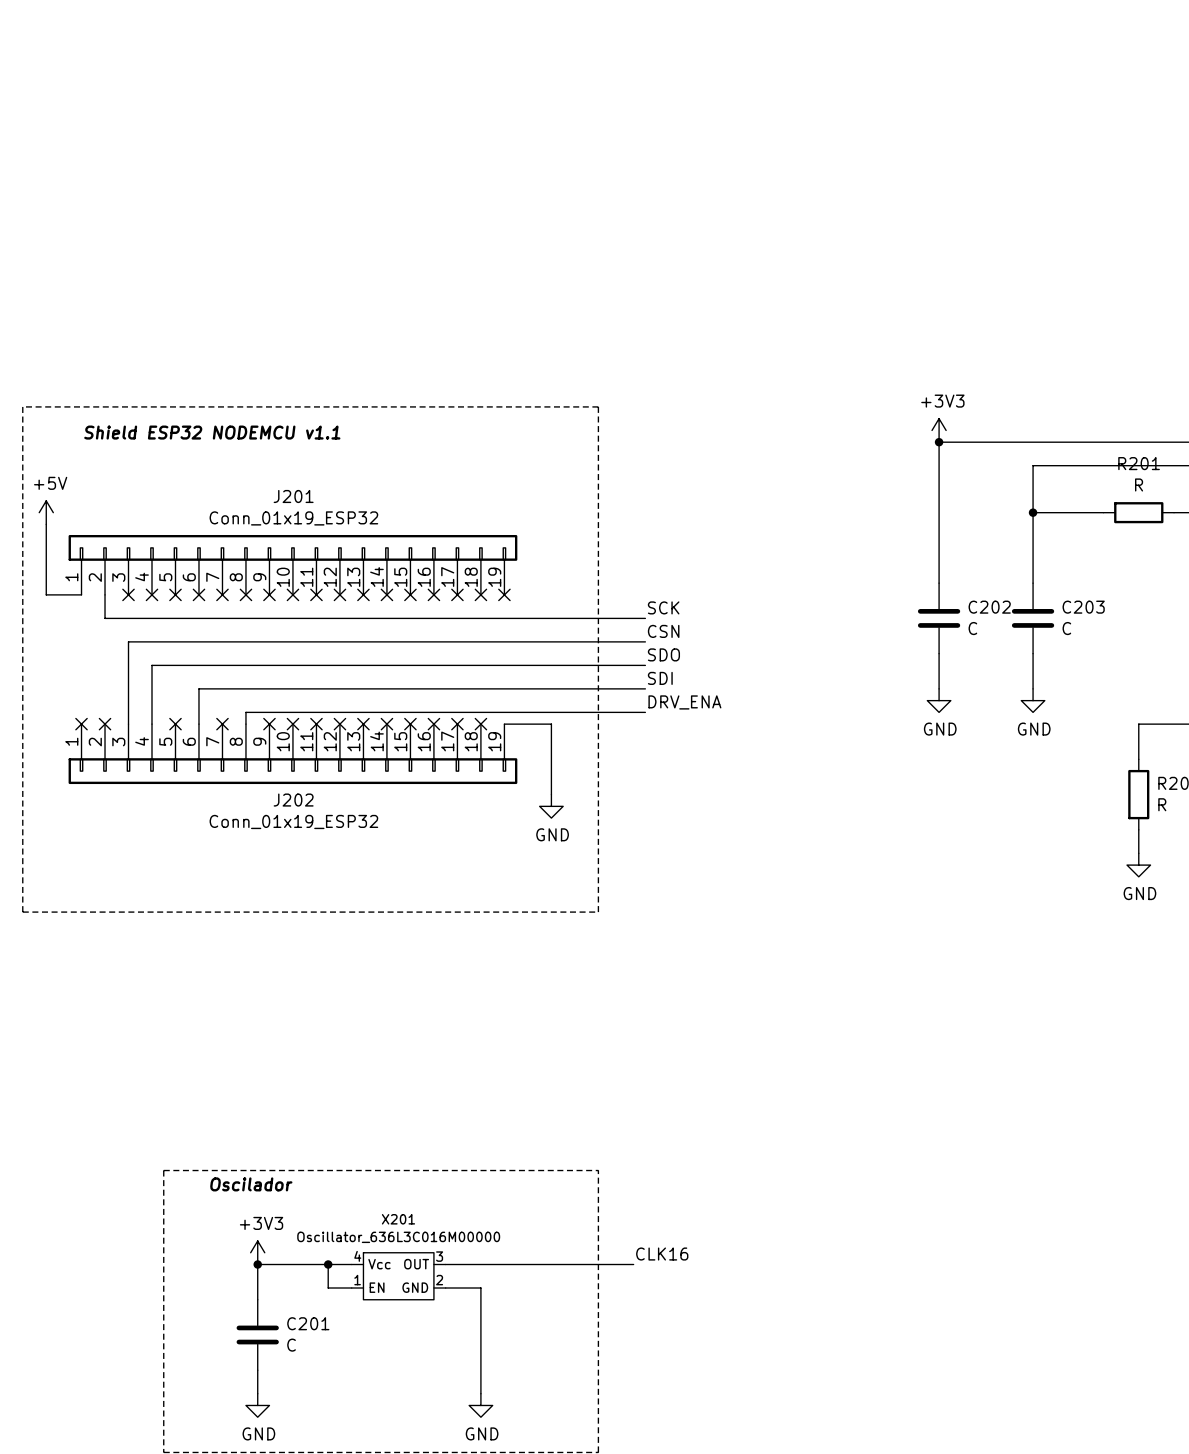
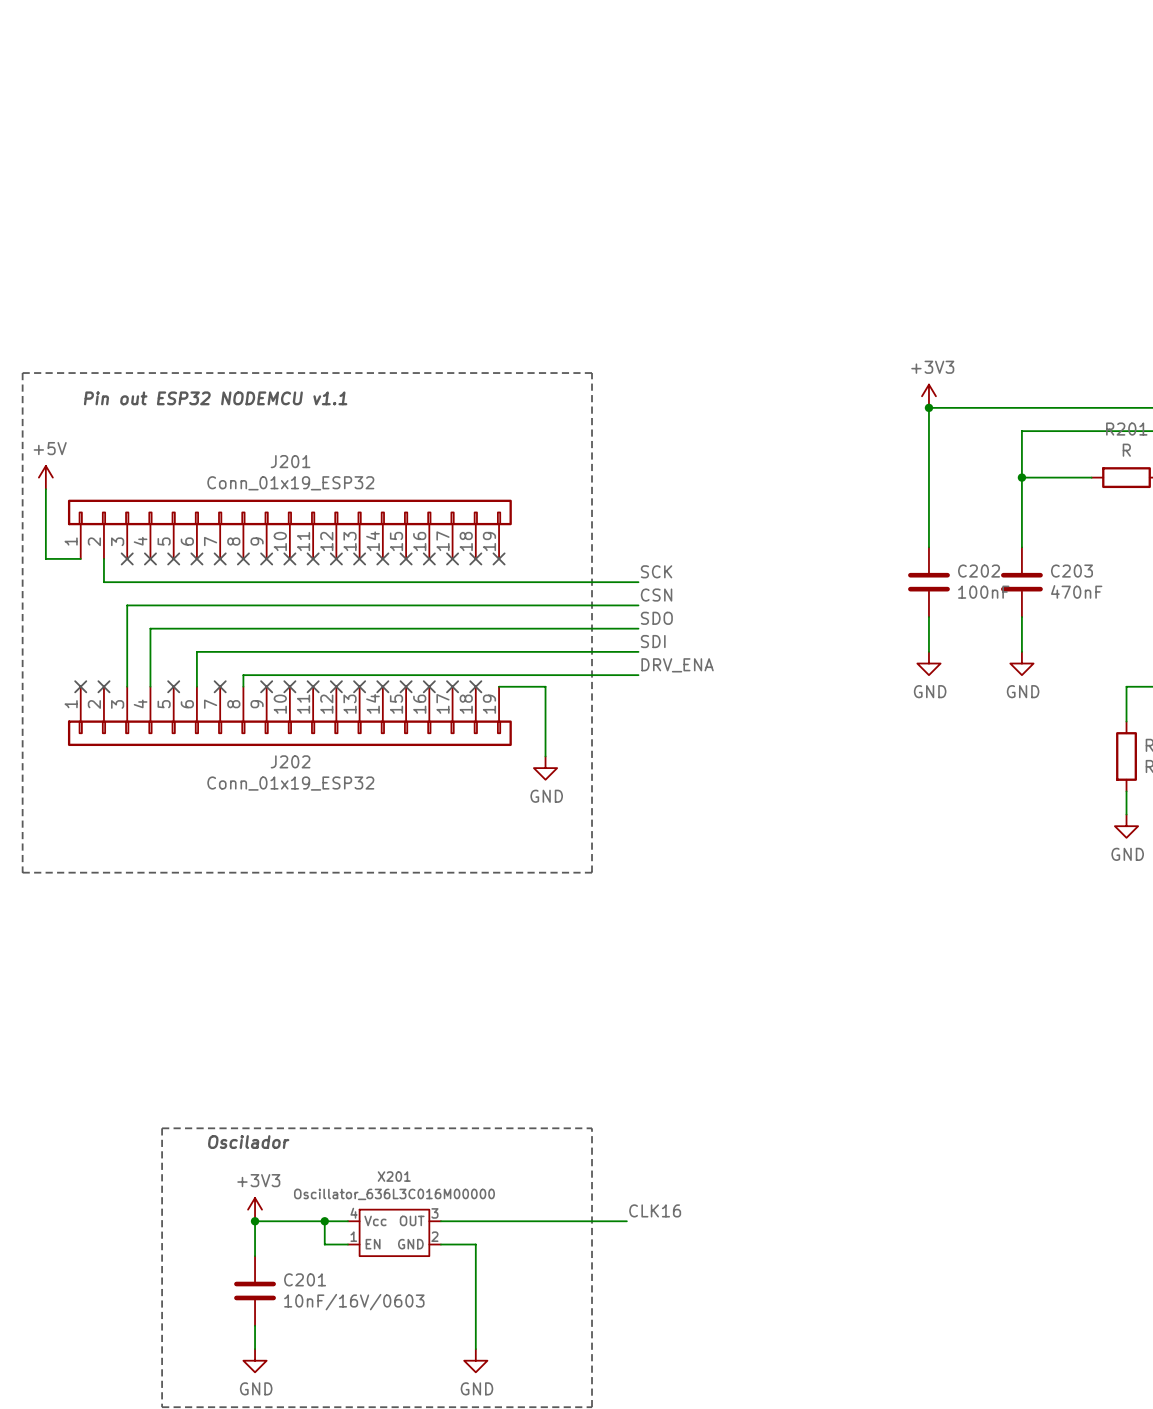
text: Shield ESP32 NODEMCU v1.1 (212, 432) -> Pin out ESP32 NODEMCU v1.1 (215, 398)
C202 value: C (972, 628) -> 100nF (983, 592)
C203 value: C (1066, 628) -> 470nF (1076, 591)
C201 value: C (291, 1345) -> 10nF/16V/0603 (354, 1302)

